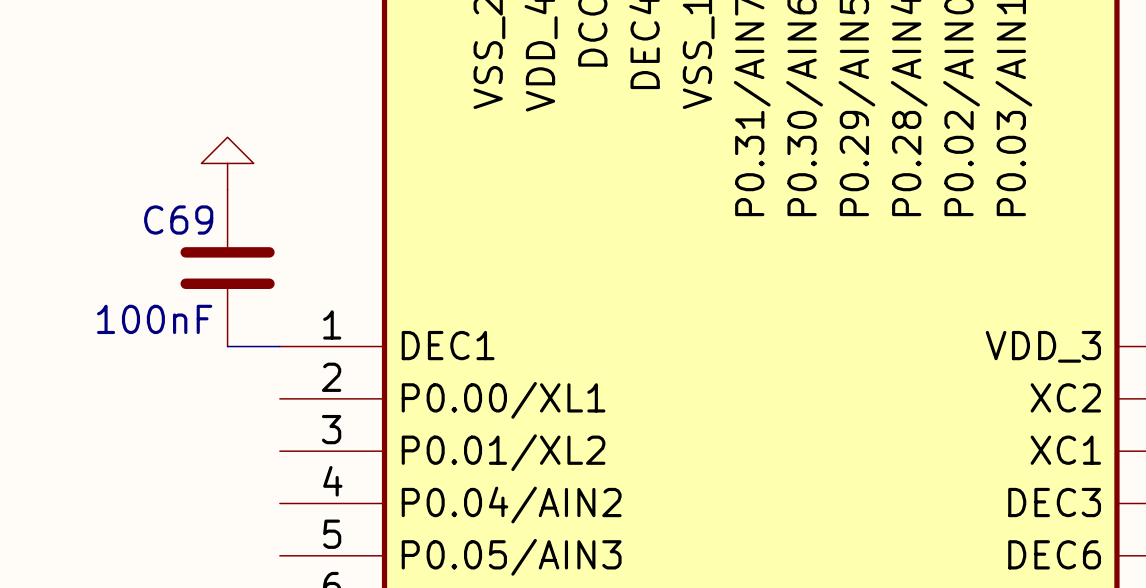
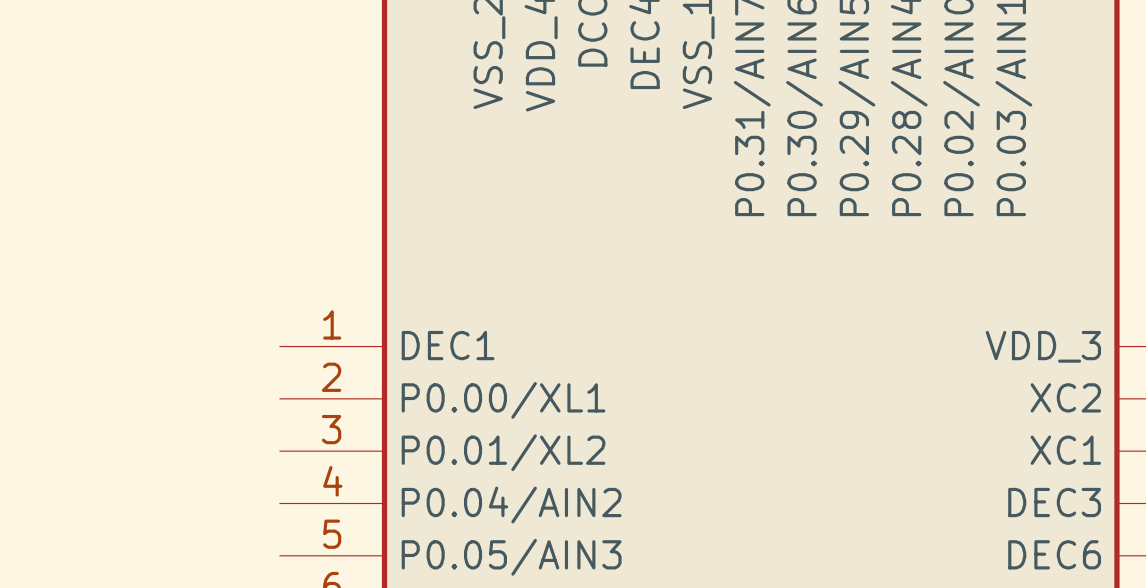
power symbol: (227, 163) -> none
C69: 100nF (227, 268) -> none
wire: (227, 346) (279, 346) -> none

